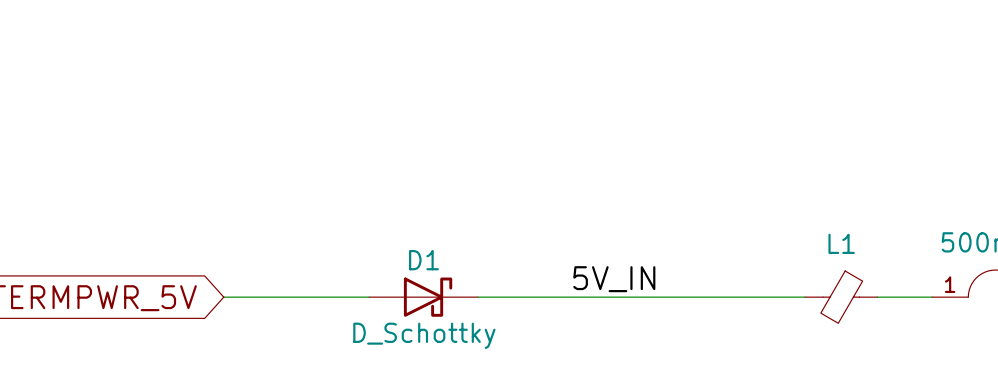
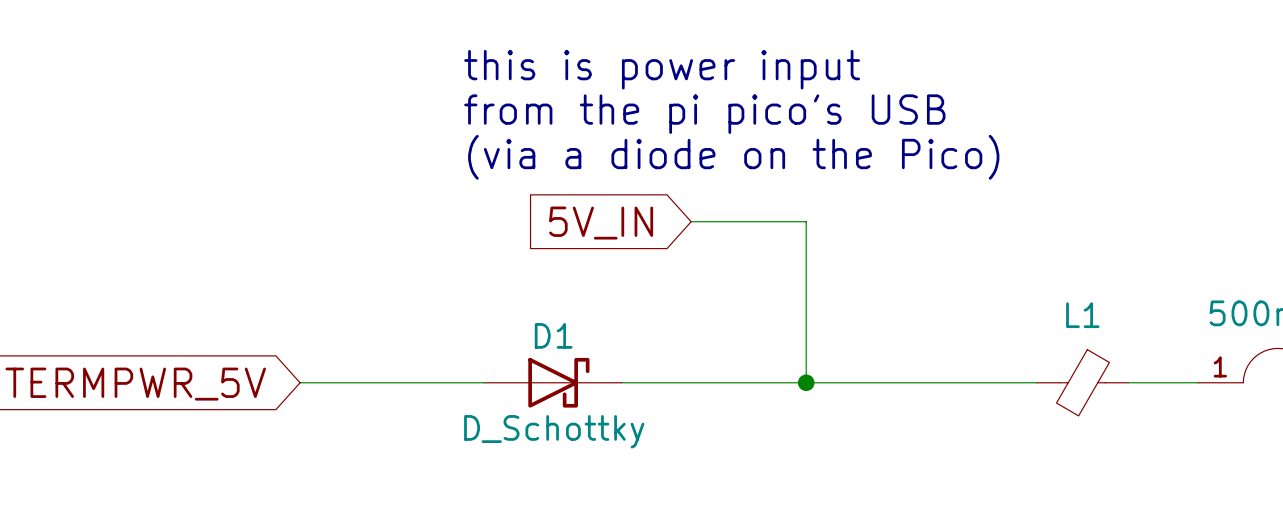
text: none -> this is power input (662, 69)
text: none -> from the pi pico's USB (704, 114)
text: none -> (via a diode on the Pico) (733, 157)
wire: none -> (691, 221) (806, 221) (806, 382)
global label: none -> 5V_IN (601, 223)
label: 5V_IN (614, 279) -> none
junction: none -> (806, 382)

